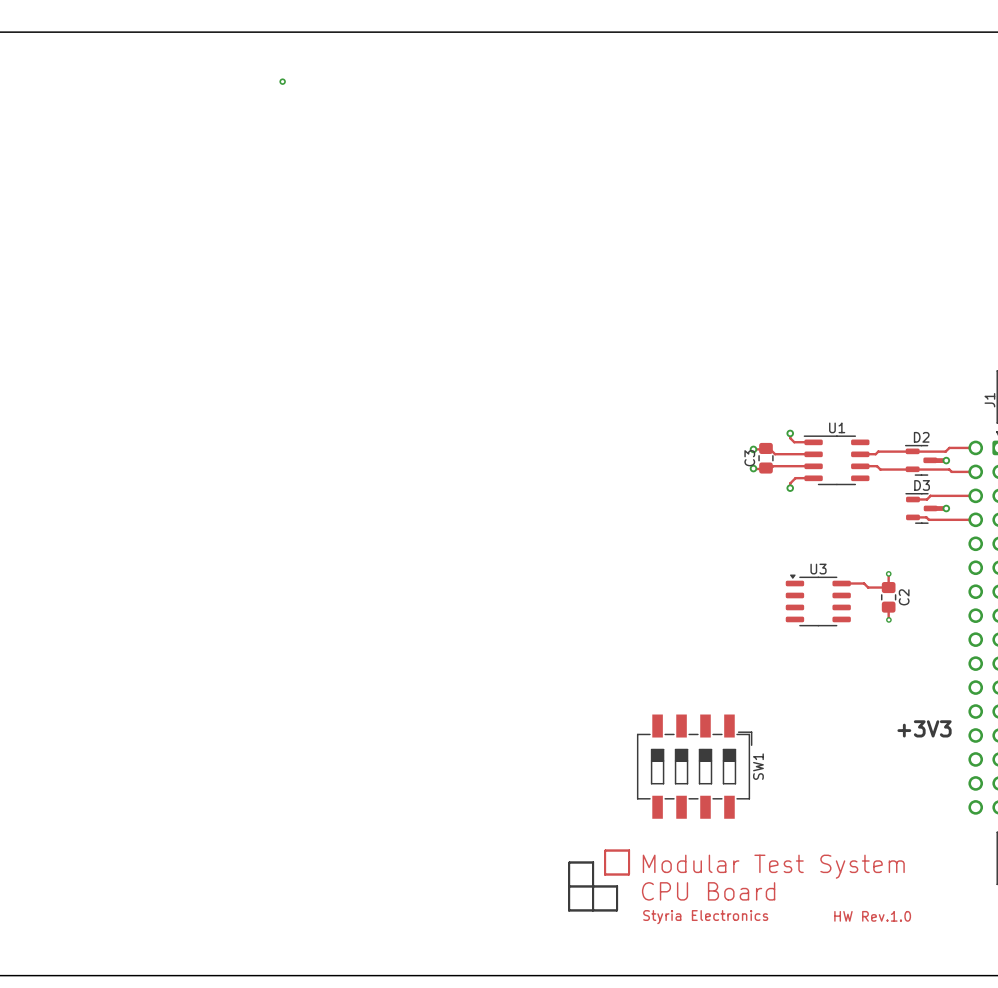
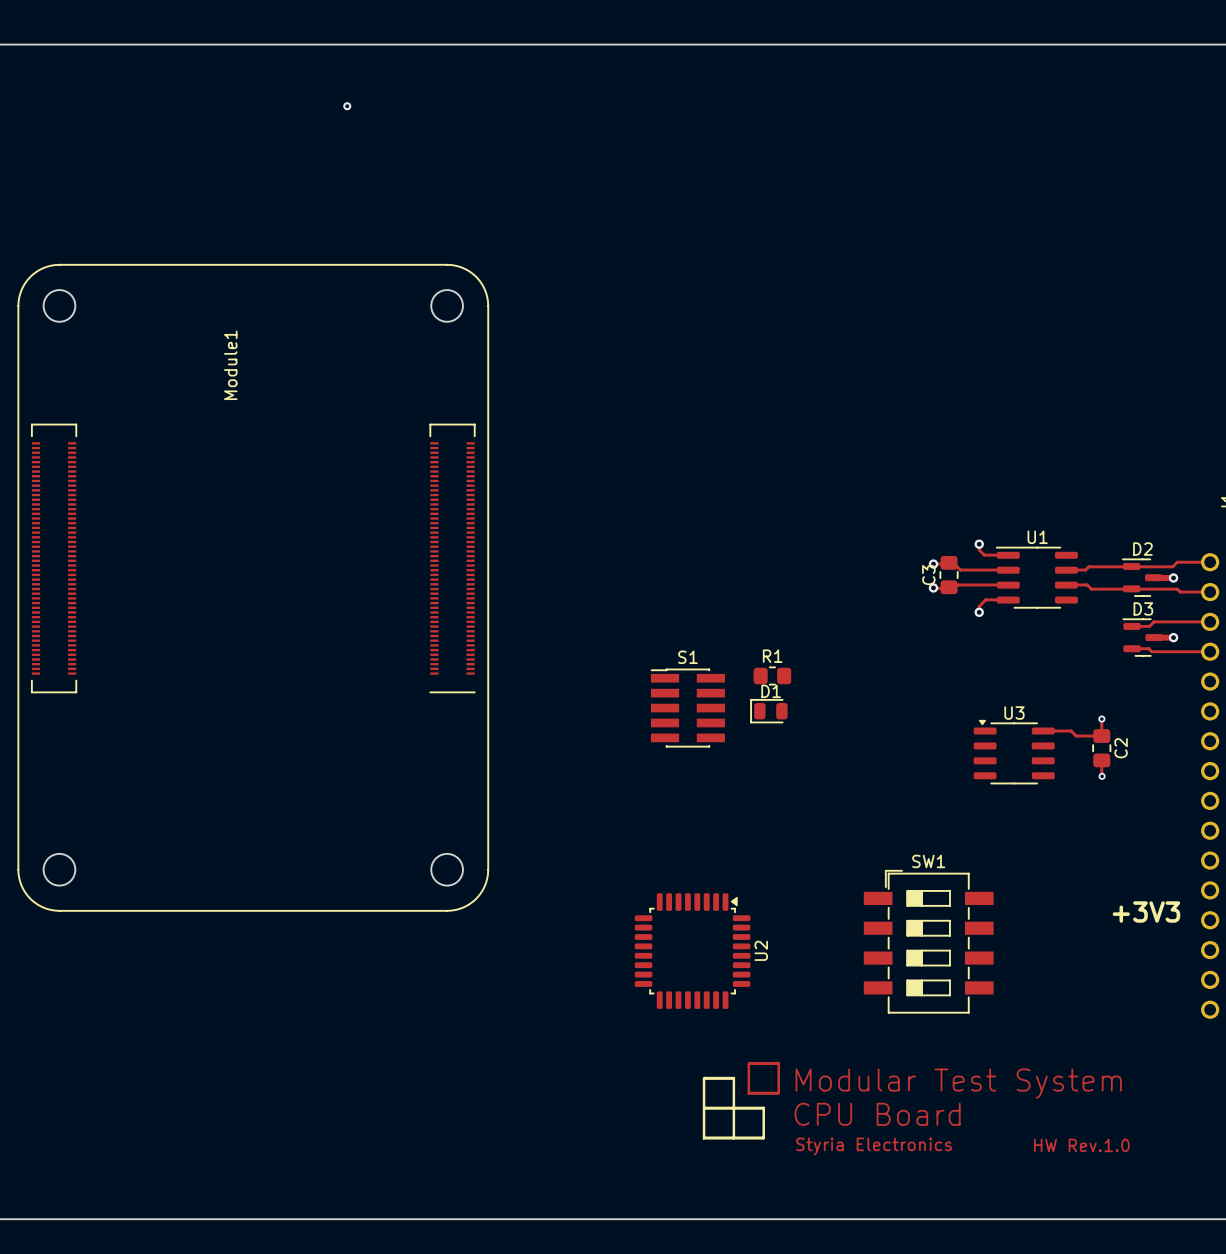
Module1: none -> (253, 587)
R1: none -> (772, 675)
S1: none -> (687, 708)
D1: none -> (768, 711)
U2: none -> (692, 951)
SW1 rotation: 0° (694, 766) -> 90° counterclockwise (928, 941)

